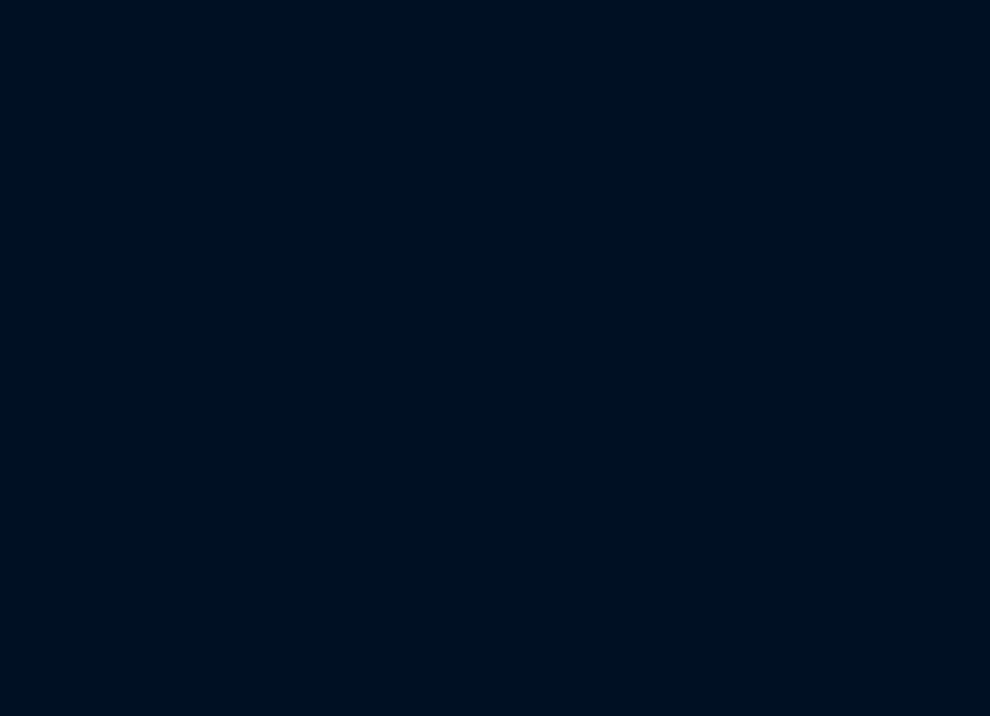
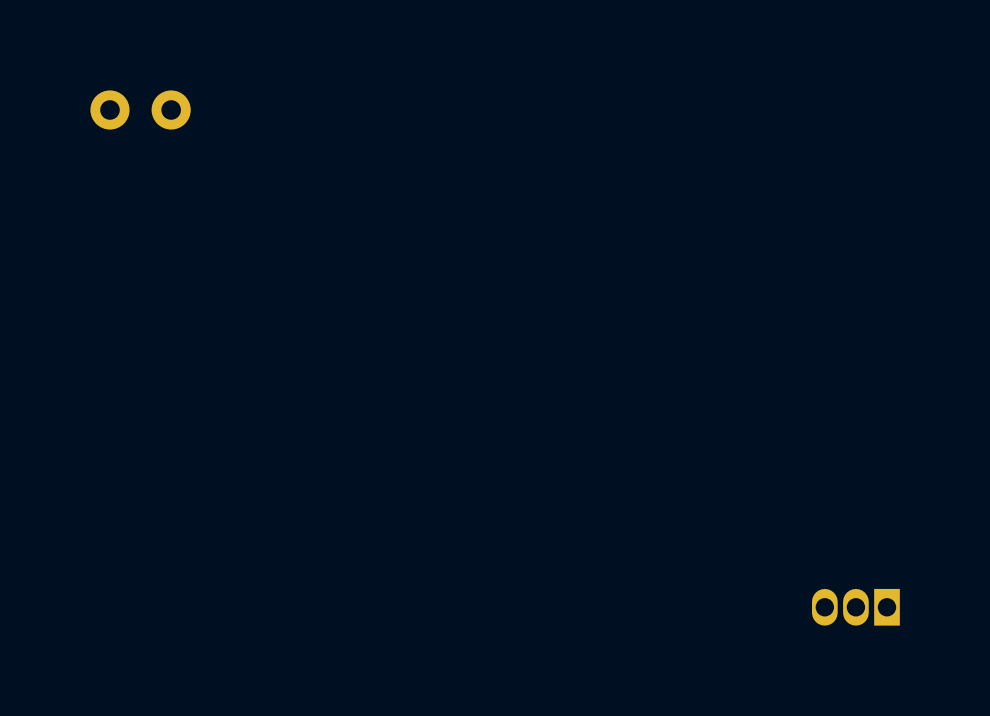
part: none -> (140, 109)
part: none -> (855, 607)

